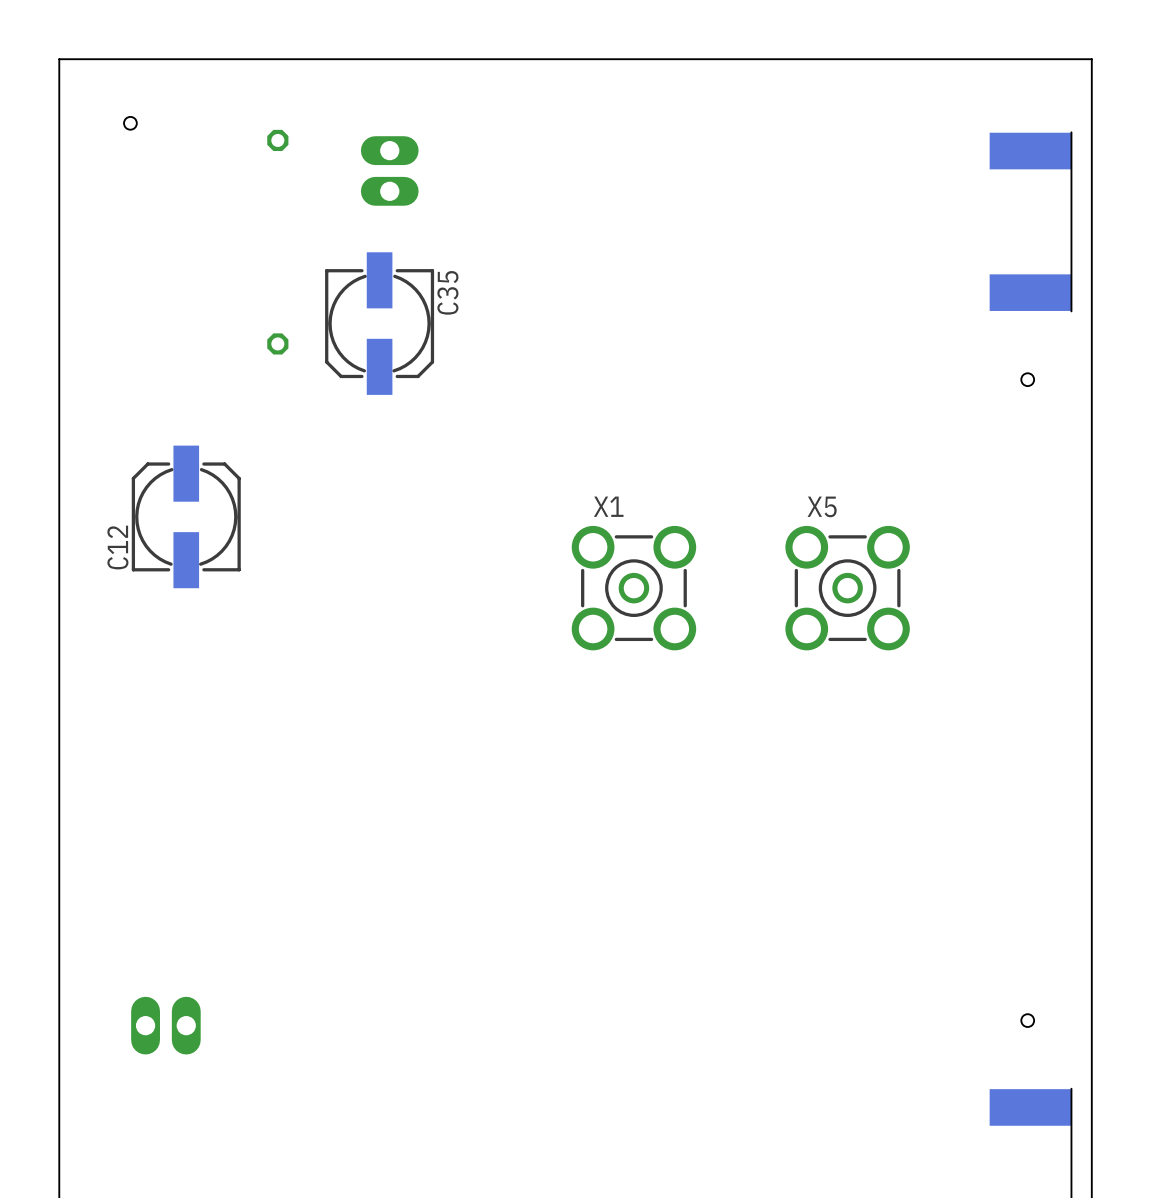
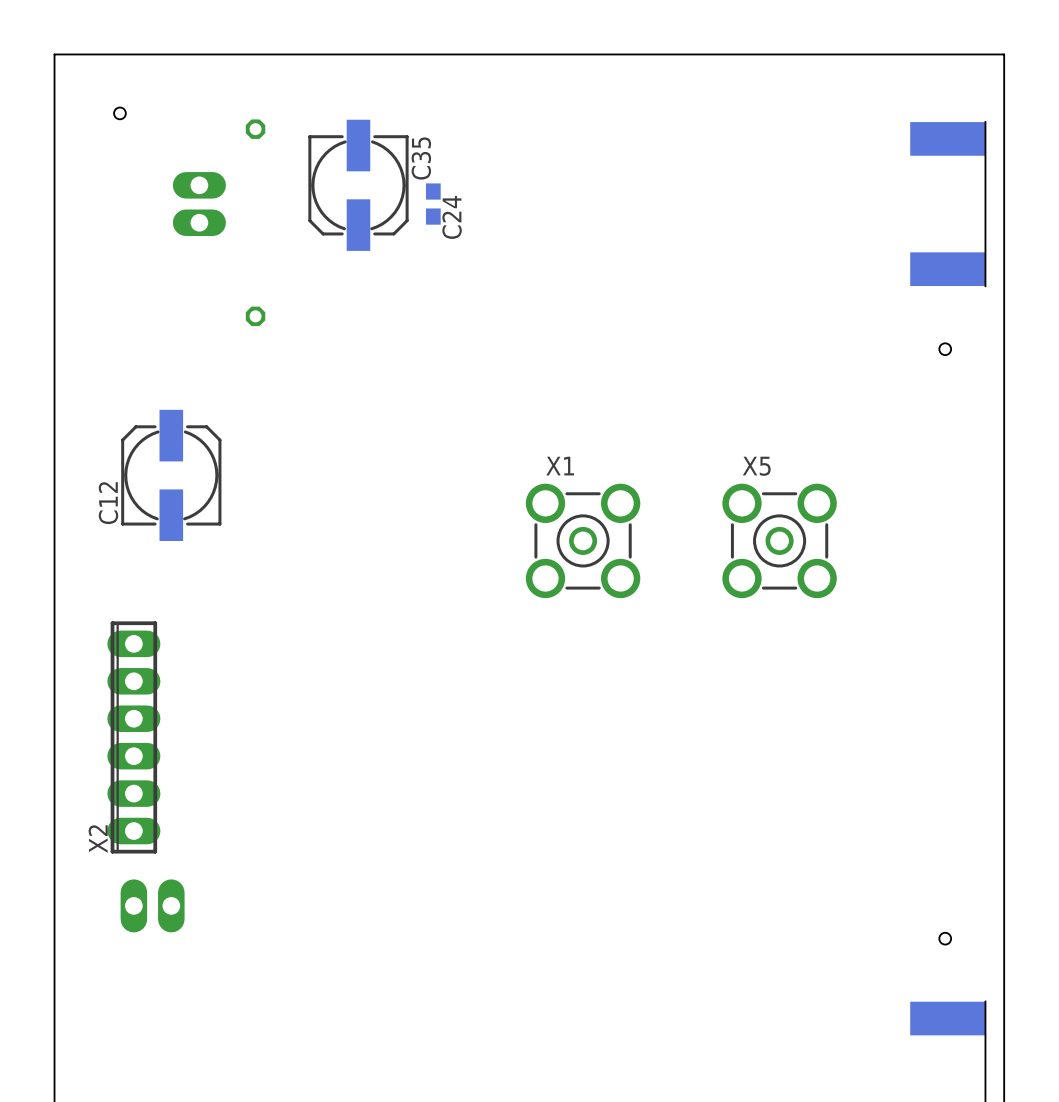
part position: (389, 170) -> (199, 204)
C24: none -> (433, 204)
C35 position: (379, 323) -> (358, 185)
X2: none -> (133, 737)
part position: (165, 1025) -> (152, 905)

